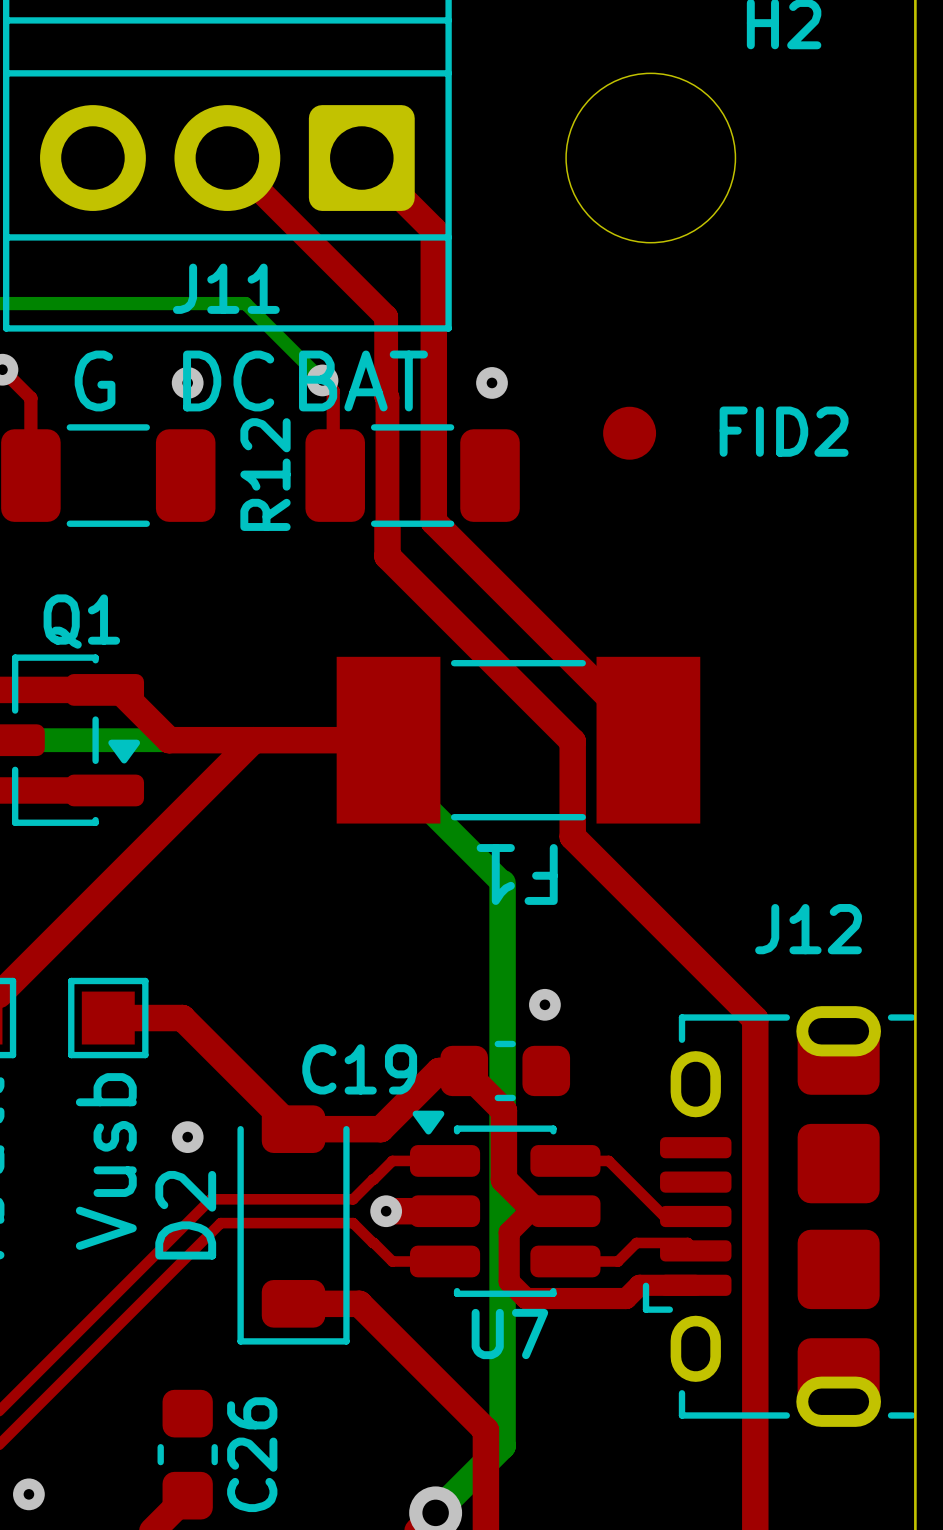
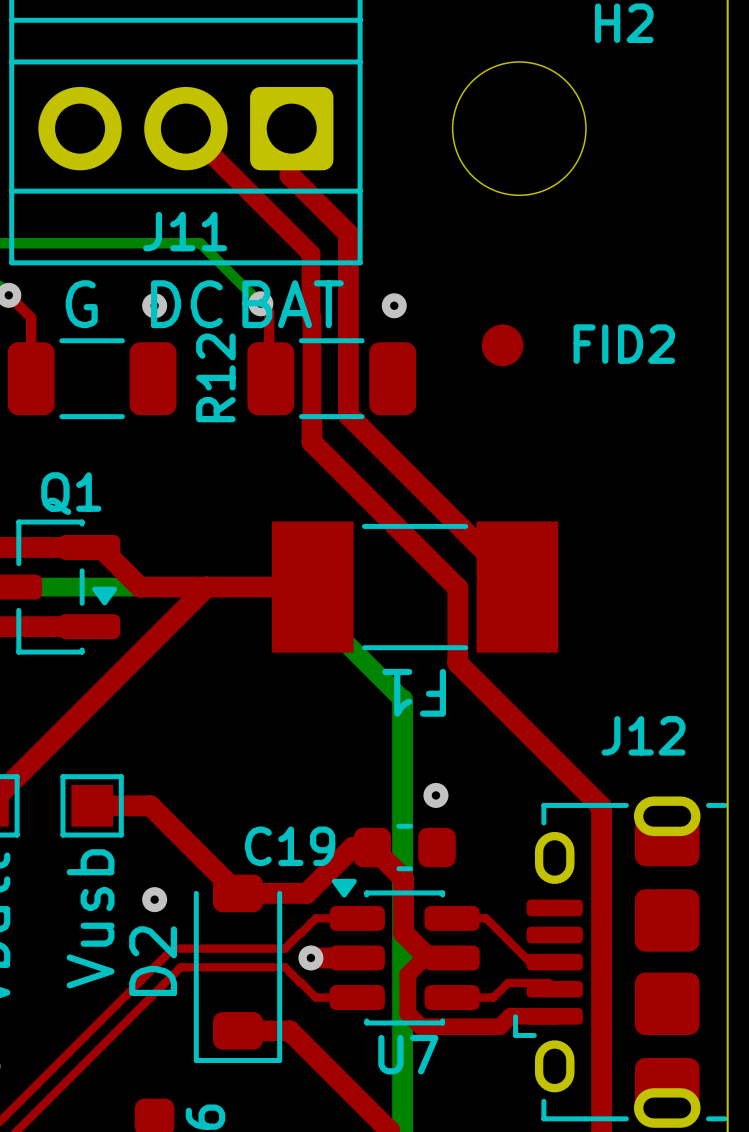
top track: (361, 158) (433, 230) (433, 291) -> (290, 130) (290, 175) (348, 233)

